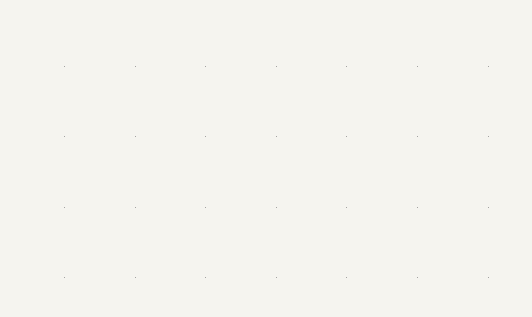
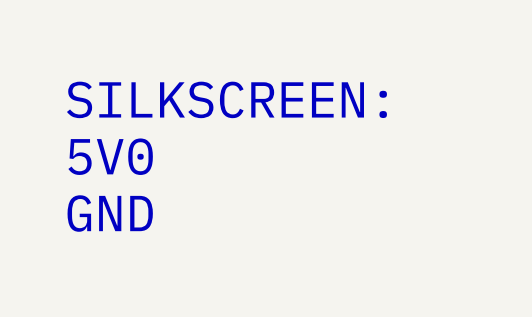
text: none -> SILKSCREEN: (226, 99)
text: none -> 5V0 (110, 156)
text: none -> GND (110, 213)

